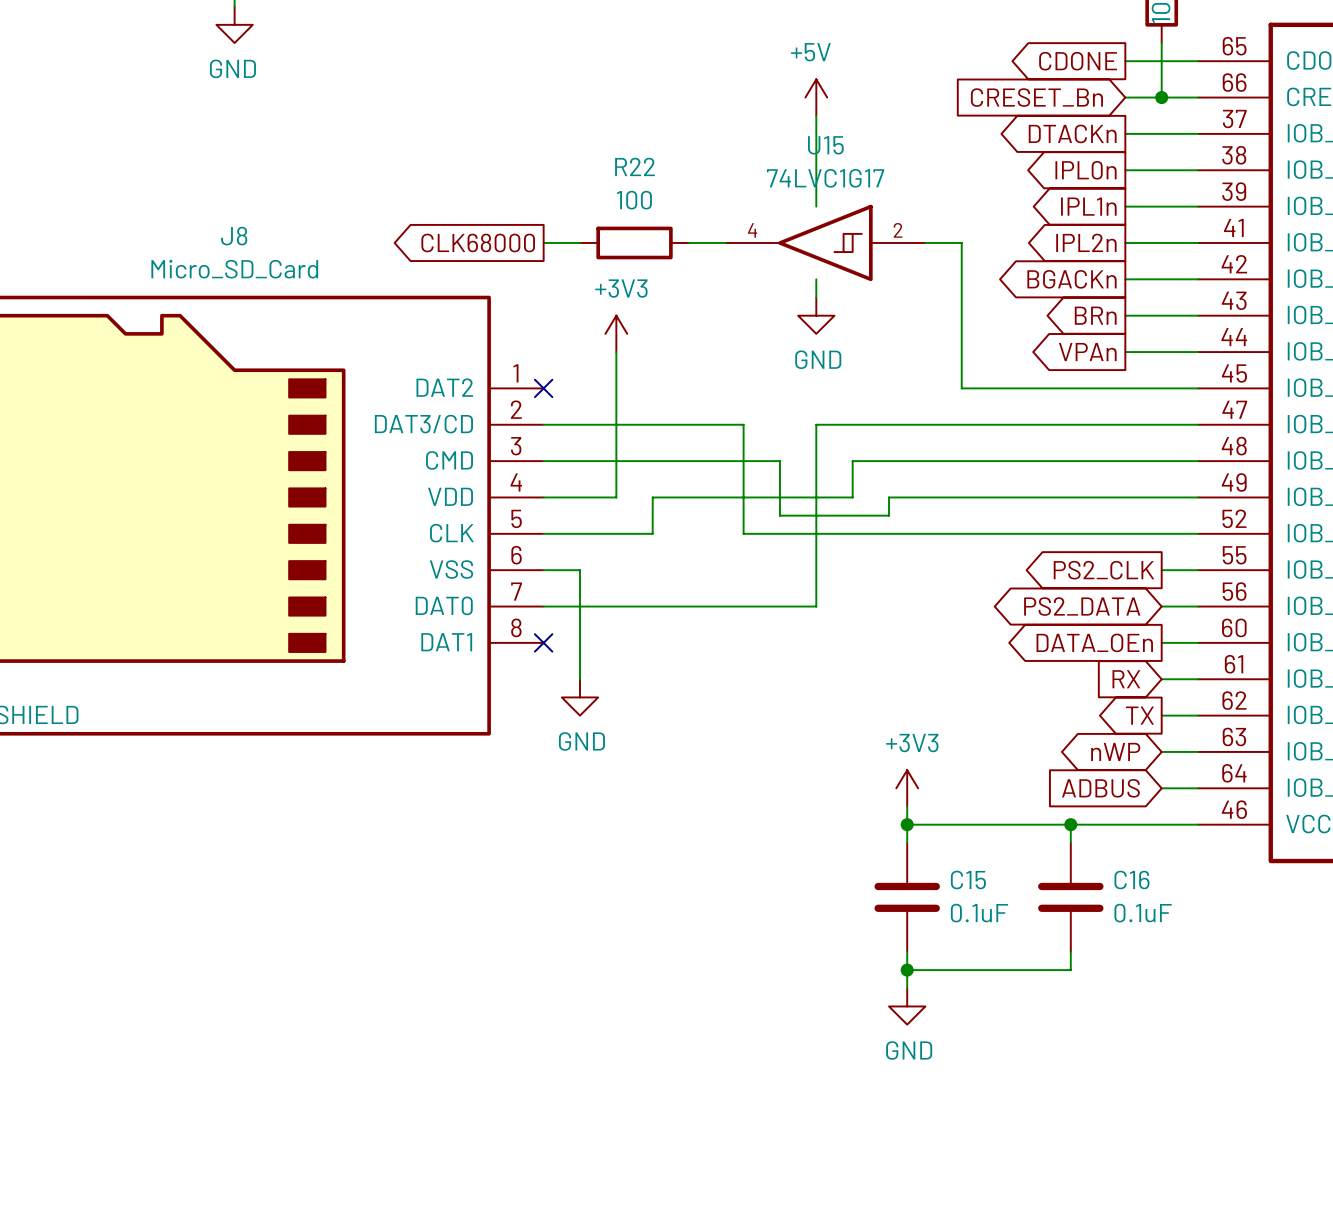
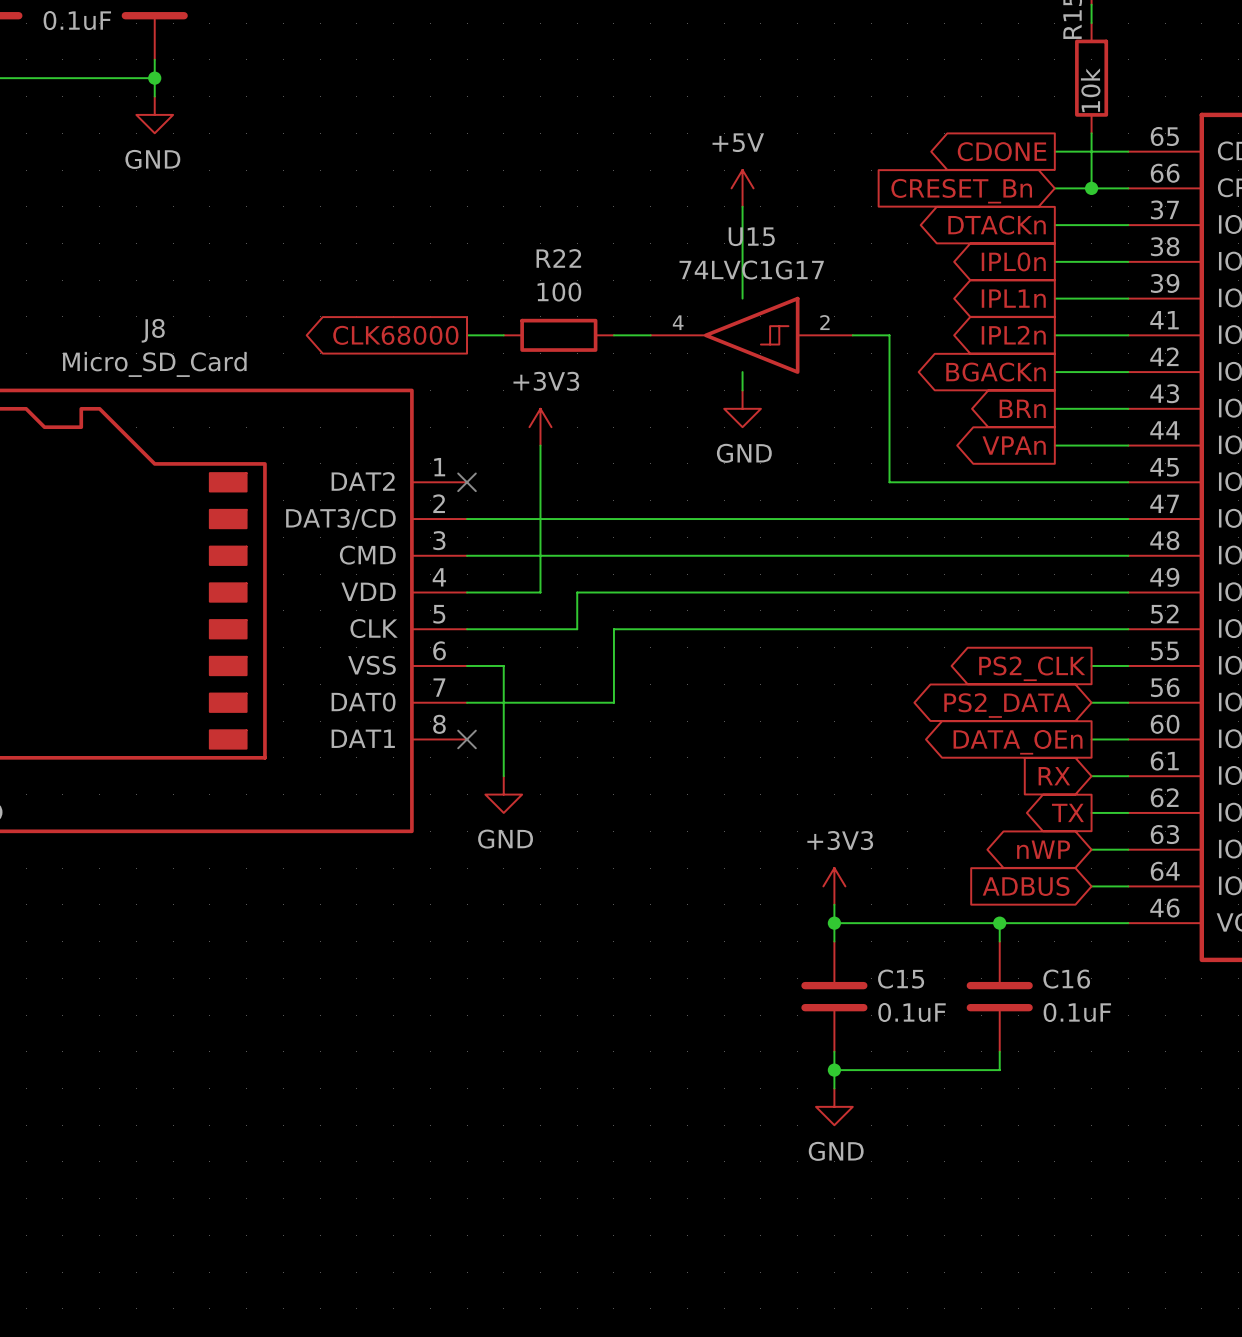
wire: (743, 424) (743, 533) -> (669, 519) (742, 519)
wire: (816, 424) (816, 606) (689, 606) -> (669, 629) (613, 629) (613, 702)
wire: (779, 461) (779, 515) (889, 515) (889, 497) -> (705, 555) (779, 555)
wire: (852, 461) (852, 497) -> (816, 592) (779, 592)

